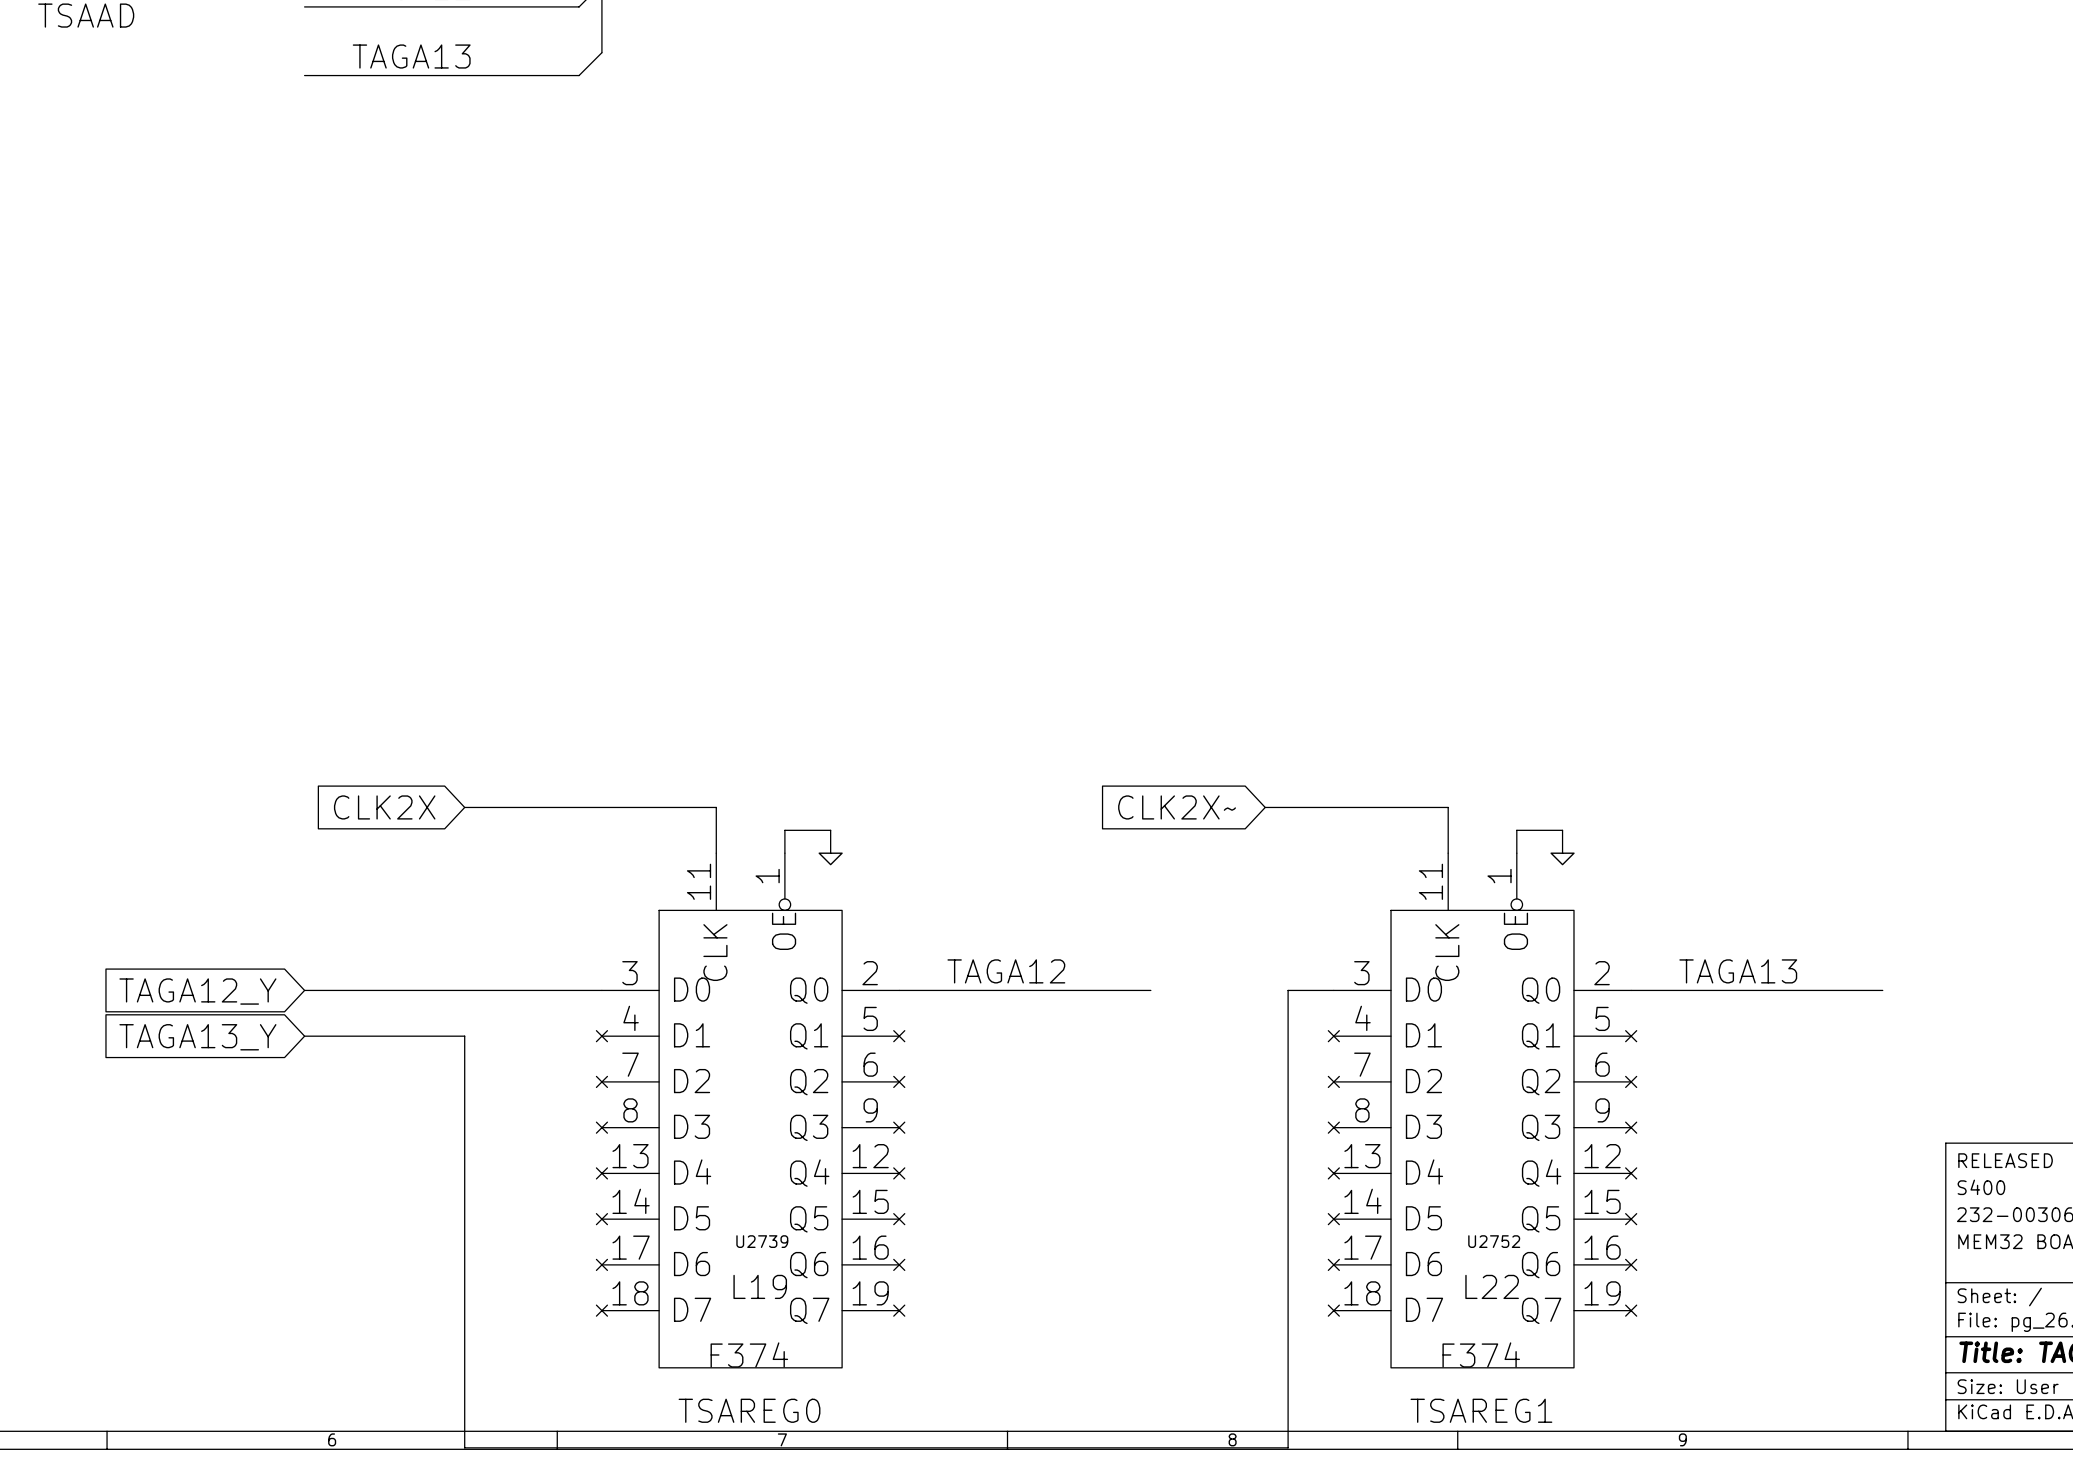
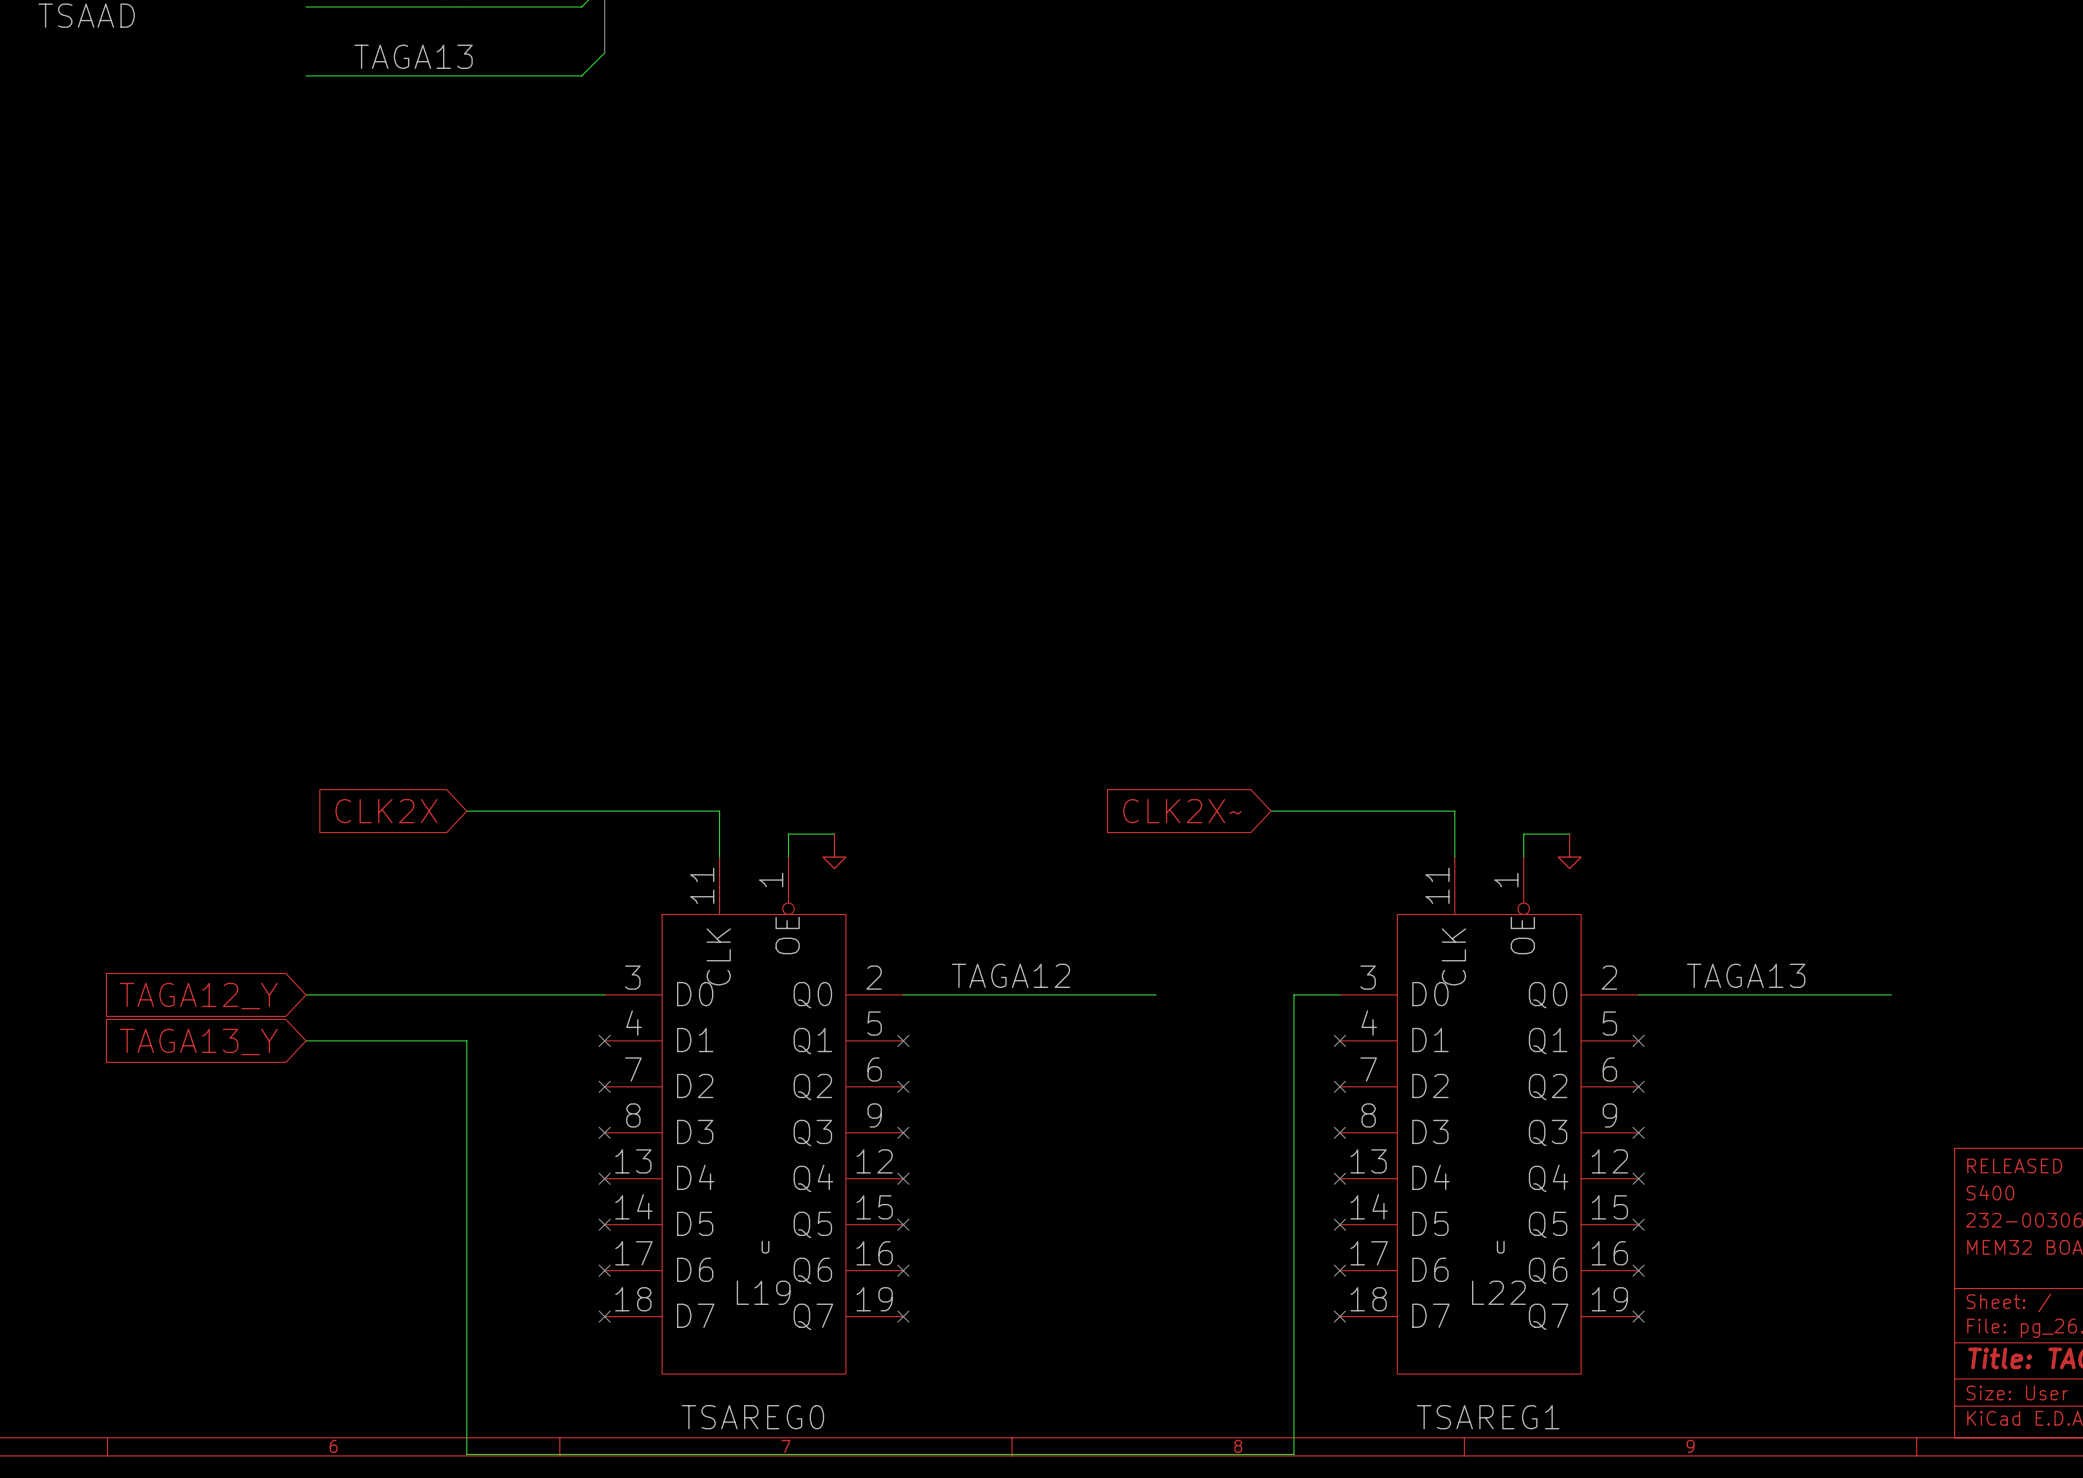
U2739 name: U2739 (762, 1241) -> U (765, 1247)
U2752 name: U2752 (1494, 1241) -> U (1500, 1247)
U2739 value: F374 (749, 1354) -> none
U2752 value: F374 (1481, 1354) -> none

